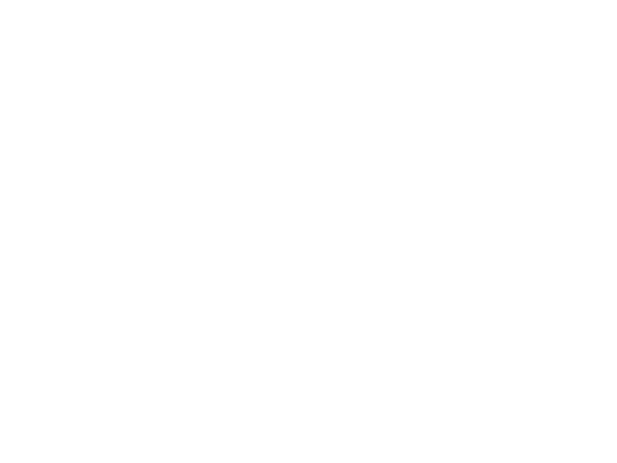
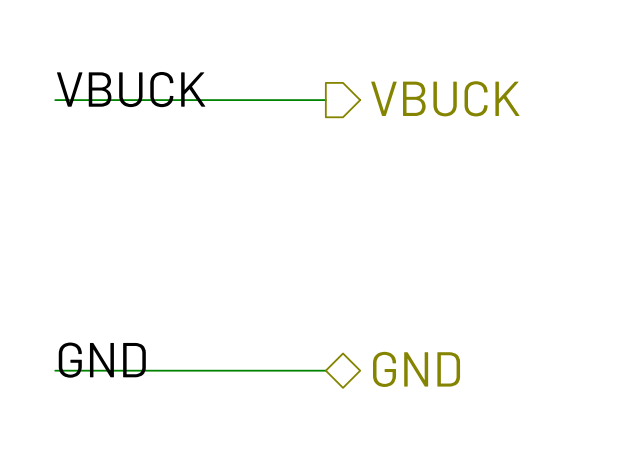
label: none -> VBUCK (131, 89)
hierarchical label: none -> VBUCK (445, 98)
wire: none -> (55, 100) (325, 100)
label: none -> GND (102, 360)
hierarchical label: none -> GND (416, 369)
wire: none -> (55, 370) (325, 370)

